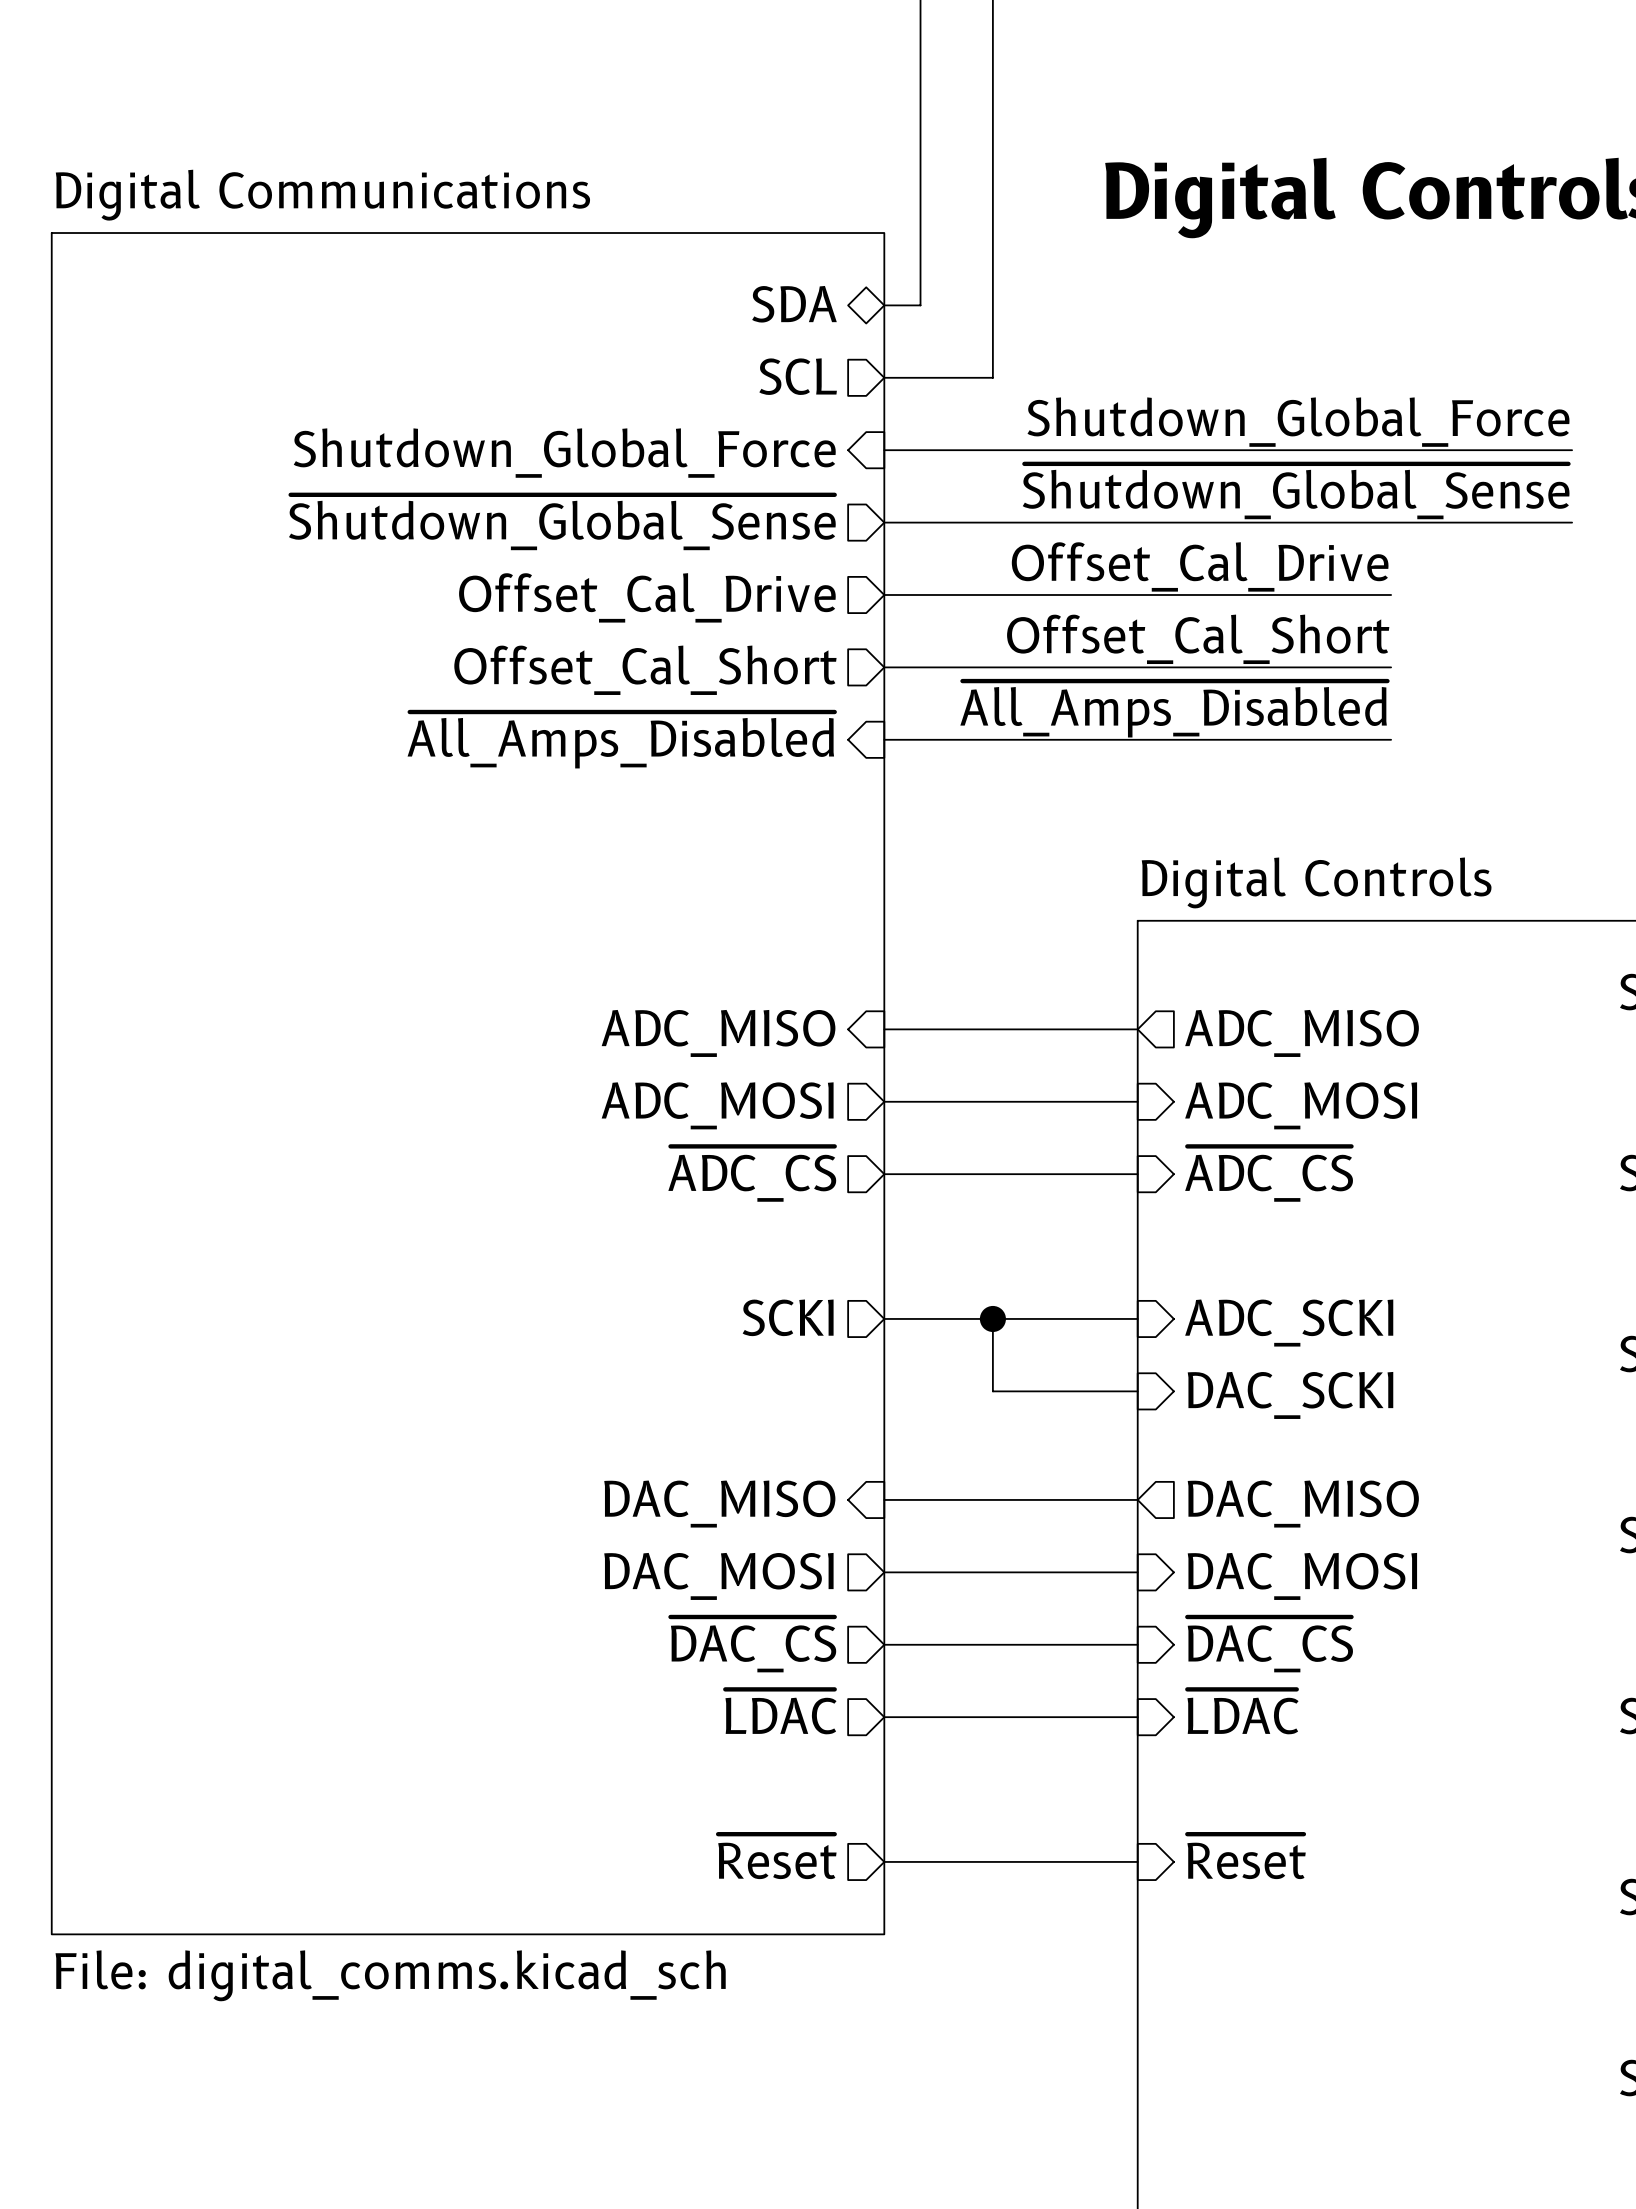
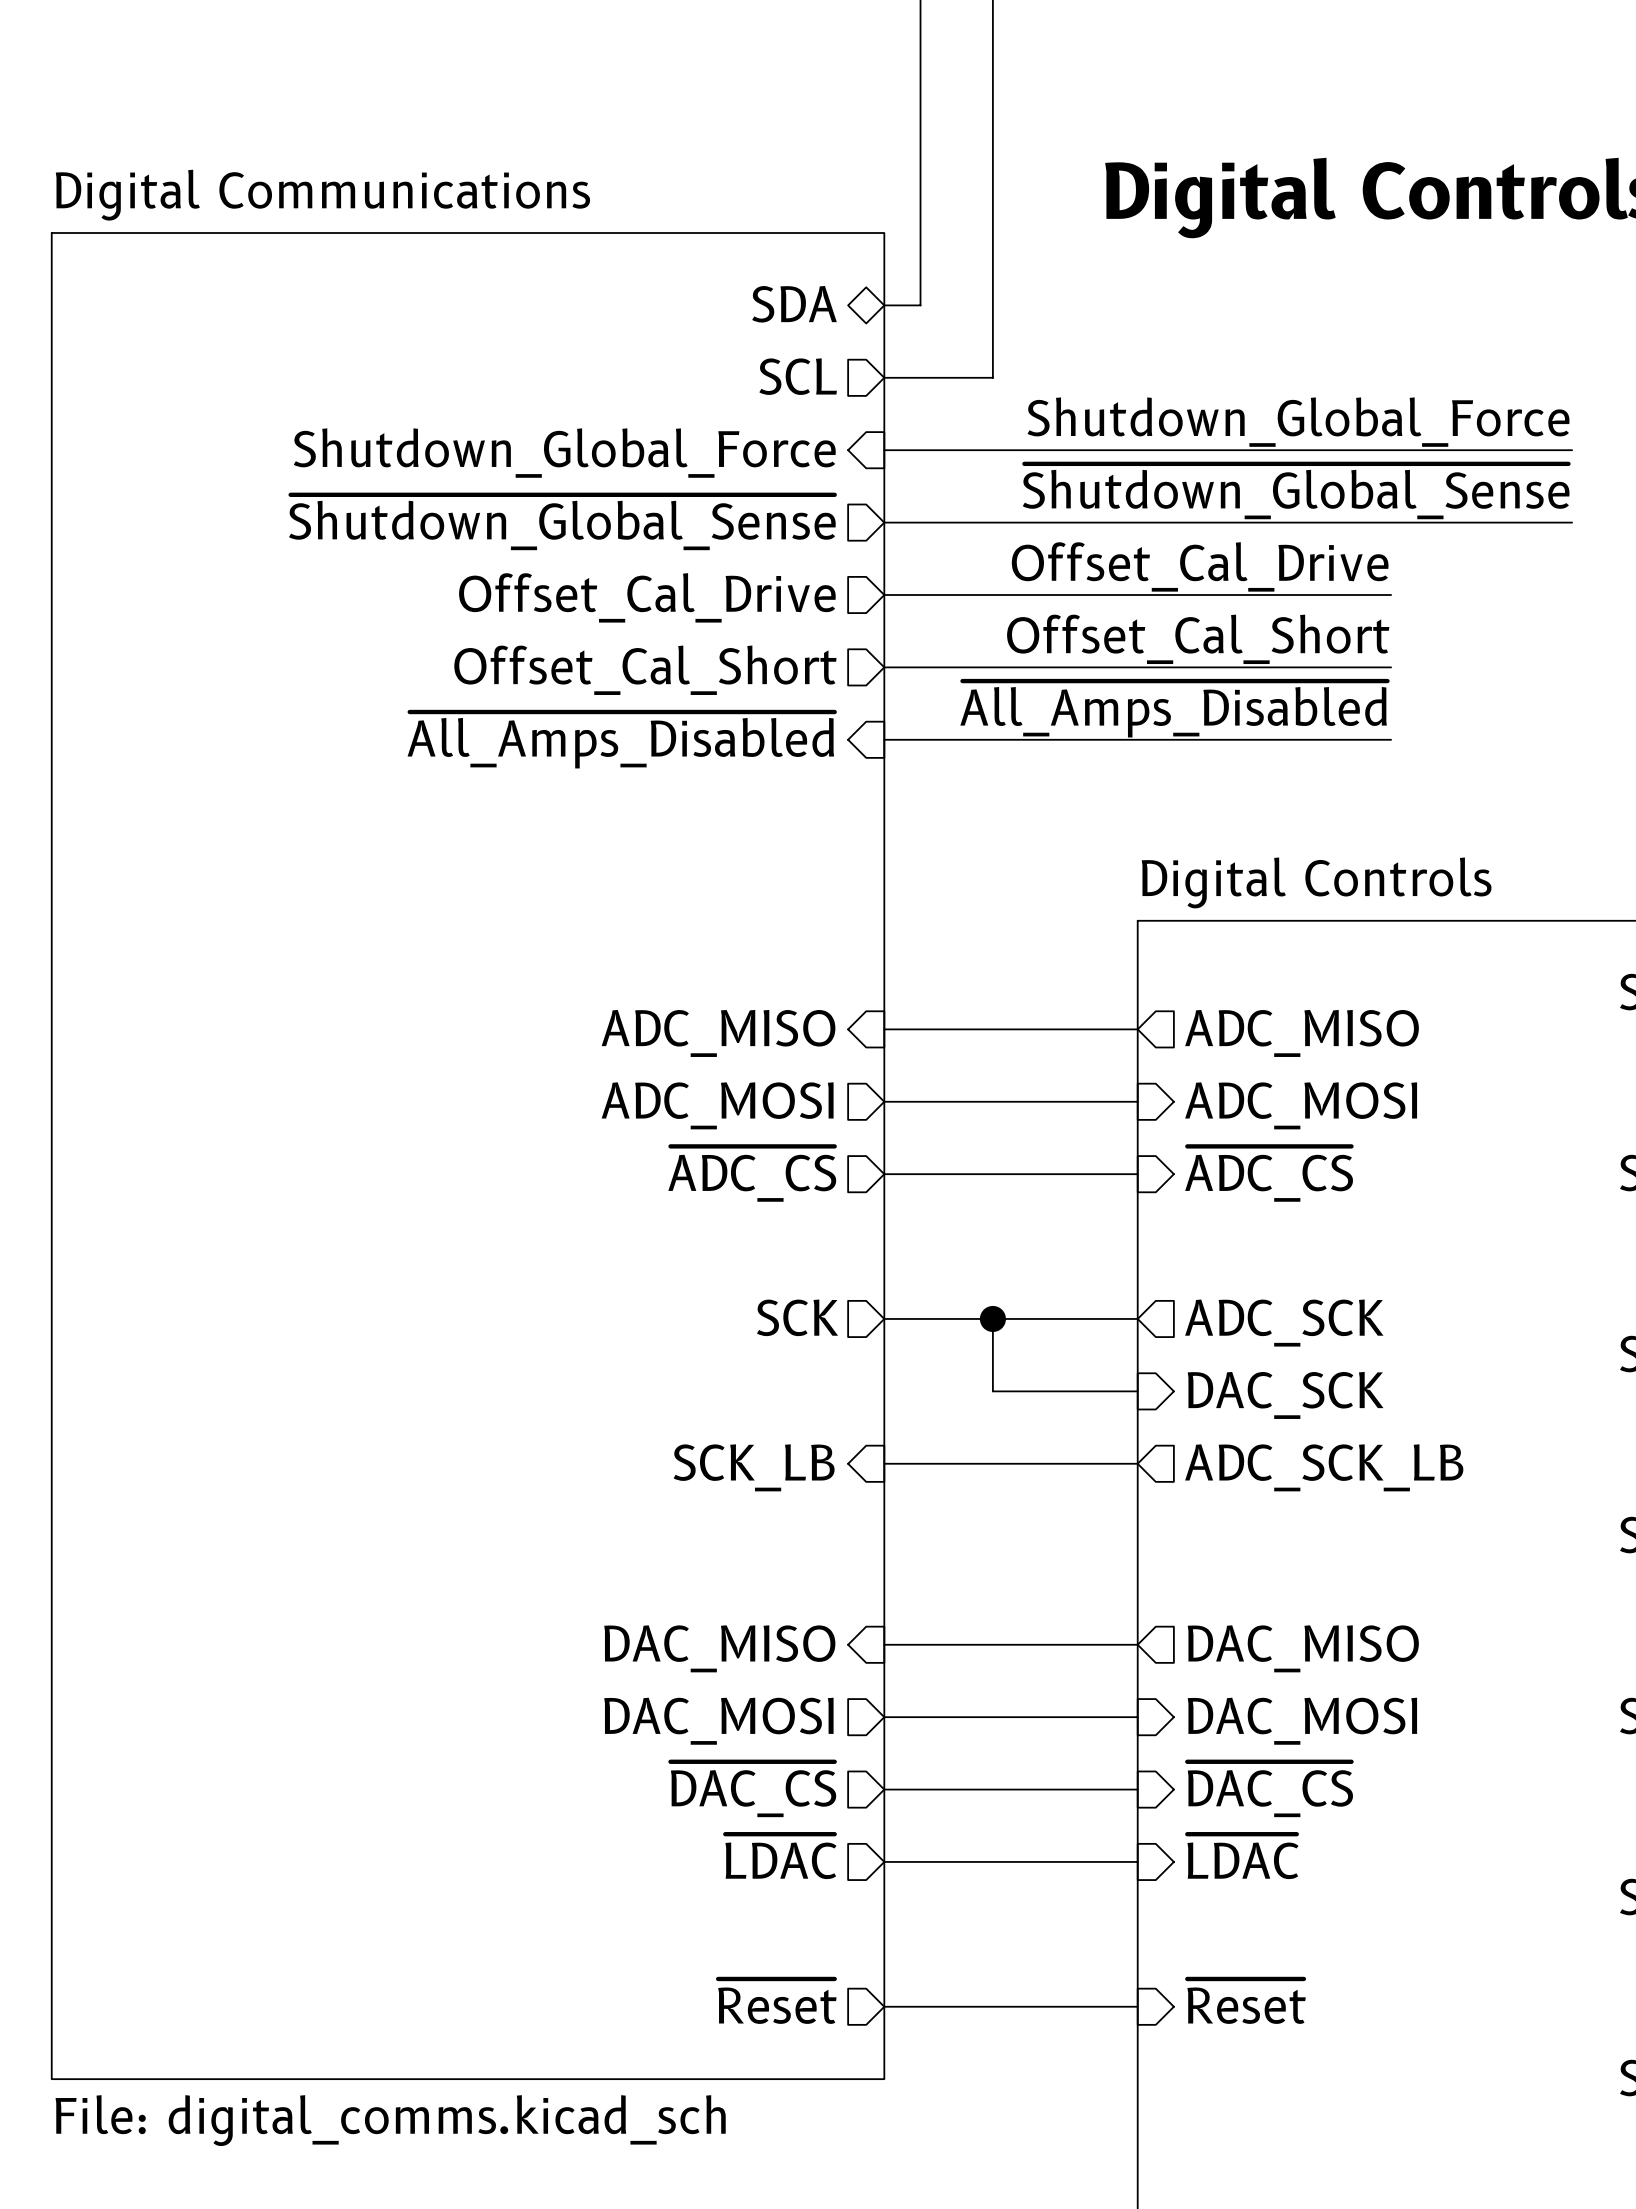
sheet Digital Communications: File: digital_comms.kicad_sch (468, 1083) -> none
sheet Digital Communications: none -> File: digital_comms.kicad_sch (468, 1156)
sheet pin: SCKI (788, 1317) -> SCK (797, 1317)
sheet pin shape: input (1289, 1323) -> output (1284, 1323)
sheet pin: ADC_SCKI (1289, 1323) -> ADC_SCK (1284, 1323)
sheet pin: DAC_SCKI (1290, 1395) -> DAC_SCK (1285, 1395)
sheet pin: none -> SCK_LB (754, 1467)
sheet pin: none -> ADC_SCK_LB (1324, 1467)
wire: (884, 1499) (1137, 1499) -> (884, 1463) (1137, 1463)
sheet pin: DAC_MISO (719, 1504) -> none
sheet pin: DAC_MISO (1303, 1504) -> none
wire: (884, 1572) (1137, 1572) -> (884, 1789) (1137, 1789)
sheet pin: DAC_MOSI (718, 1576) -> none
sheet pin: DAC_MOSI (1302, 1576) -> none
sheet pin shape: output (753, 1644) -> input (719, 1648)
sheet pin: ~{DAC_CS} (753, 1644) -> DAC_MISO (719, 1648)
sheet pin shape: input (1270, 1644) -> output (1303, 1648)
sheet pin: ~{DAC_CS} (1270, 1644) -> DAC_MISO (1303, 1648)
sheet pin: ~{LDAC} (780, 1711) -> DAC_MOSI (718, 1721)
sheet pin: ~{LDAC} (1242, 1711) -> DAC_MOSI (1302, 1721)
sheet pin: none -> ~{DAC_CS} (753, 1789)
sheet pin: none -> ~{DAC_CS} (1270, 1789)
sheet pin: ~{Reset} (777, 1856) -> ~{LDAC} (780, 1856)
sheet pin: ~{Reset} (1246, 1856) -> ~{LDAC} (1242, 1856)
sheet pin: none -> ~{Reset} (777, 2001)
sheet pin: none -> ~{Reset} (1246, 2001)
wire: none -> (884, 2006) (1137, 2006)

